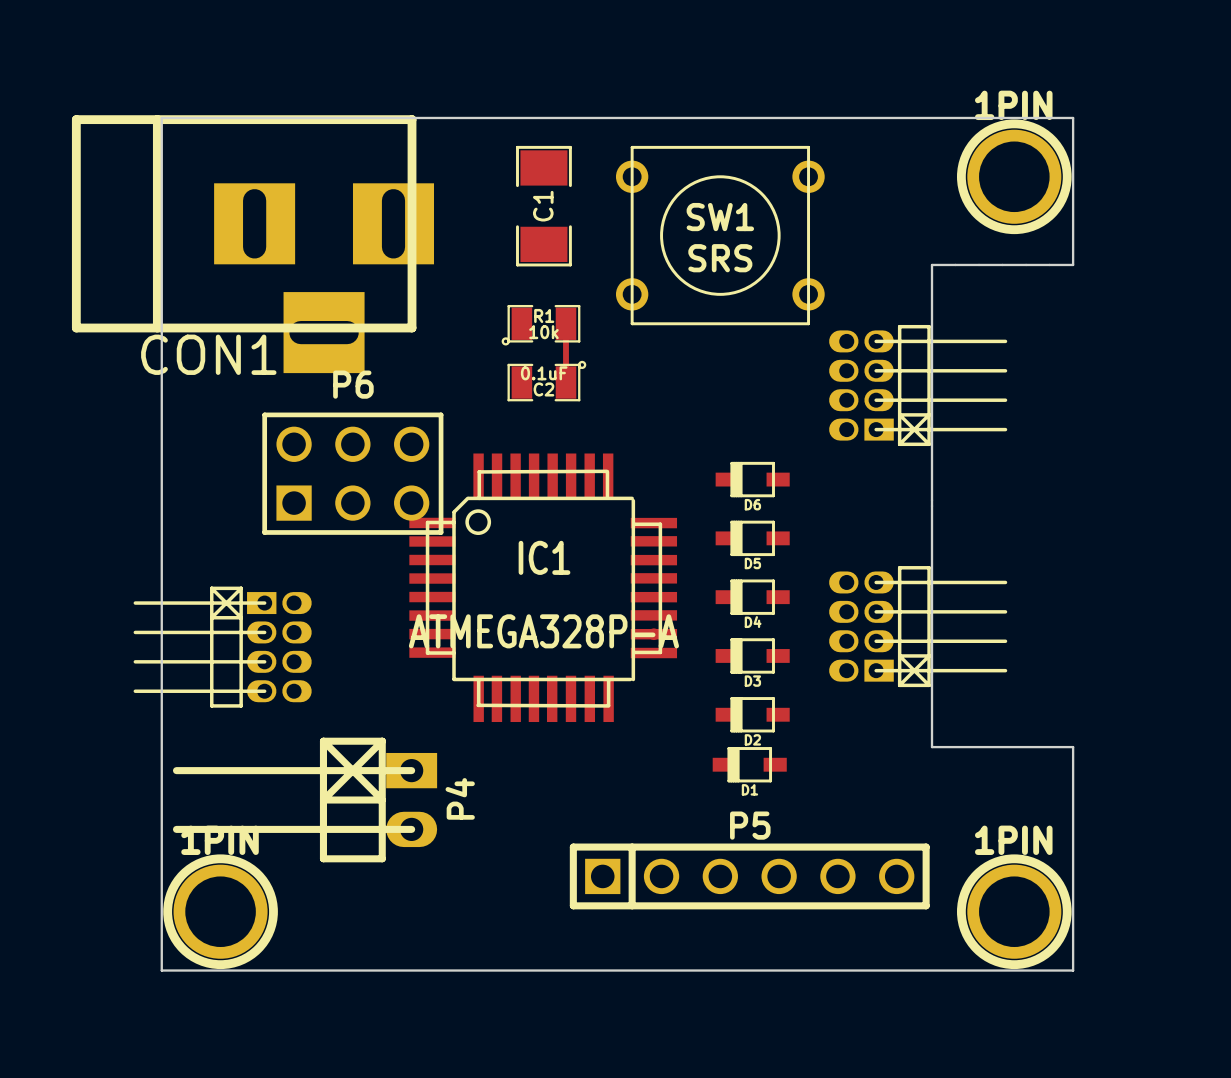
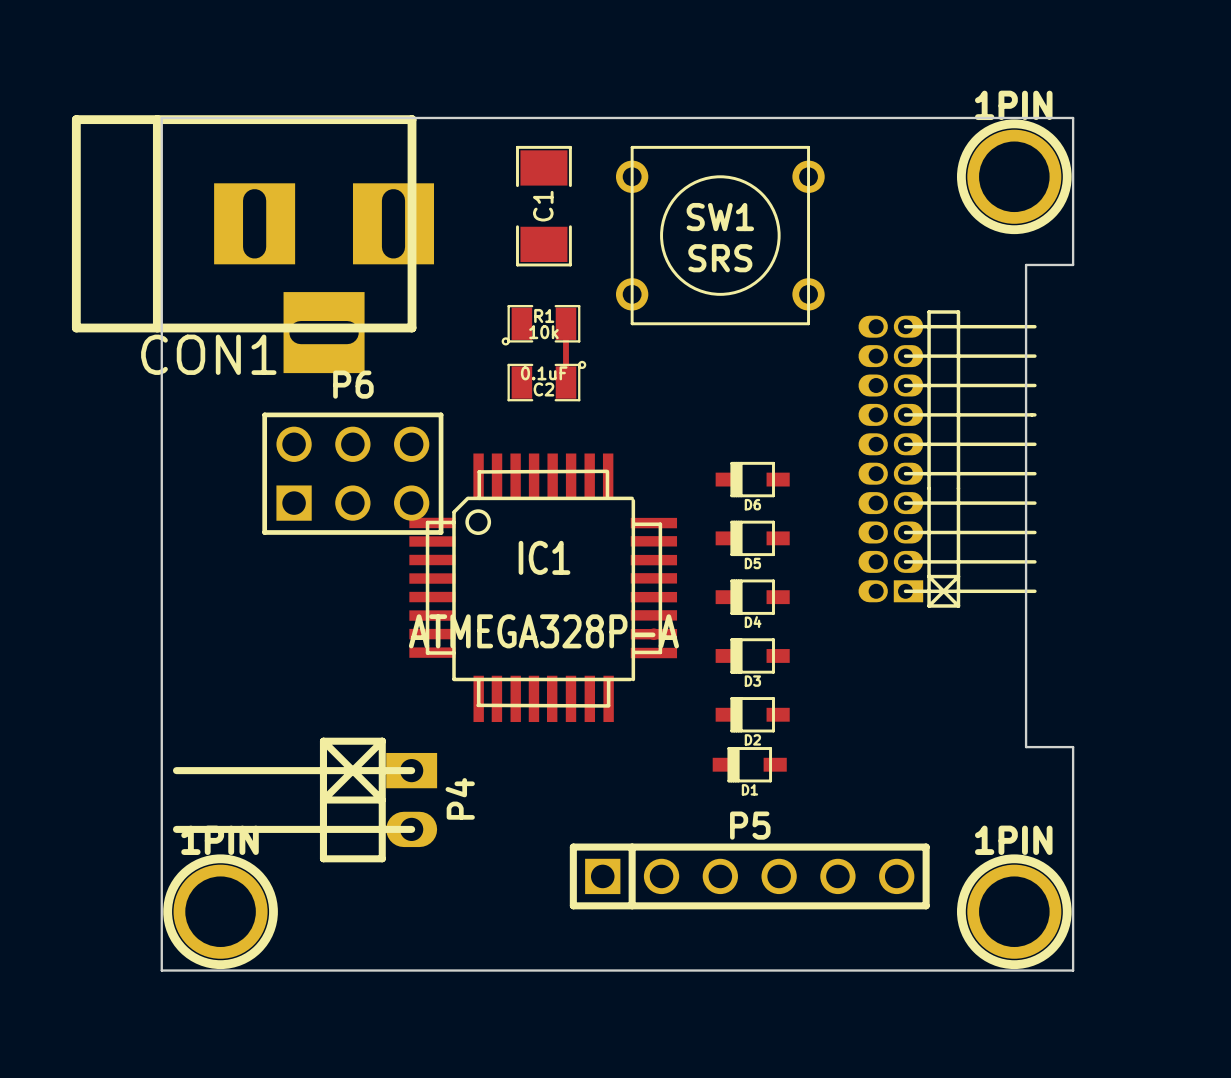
board edge: (1026, 264) (932, 264) (932, 747) (1026, 747) -> (1026, 264) (1026, 747)
part: (918, 385) -> none
part: none -> (947, 458)
part: (918, 626) -> none
part: (222, 647) -> none

